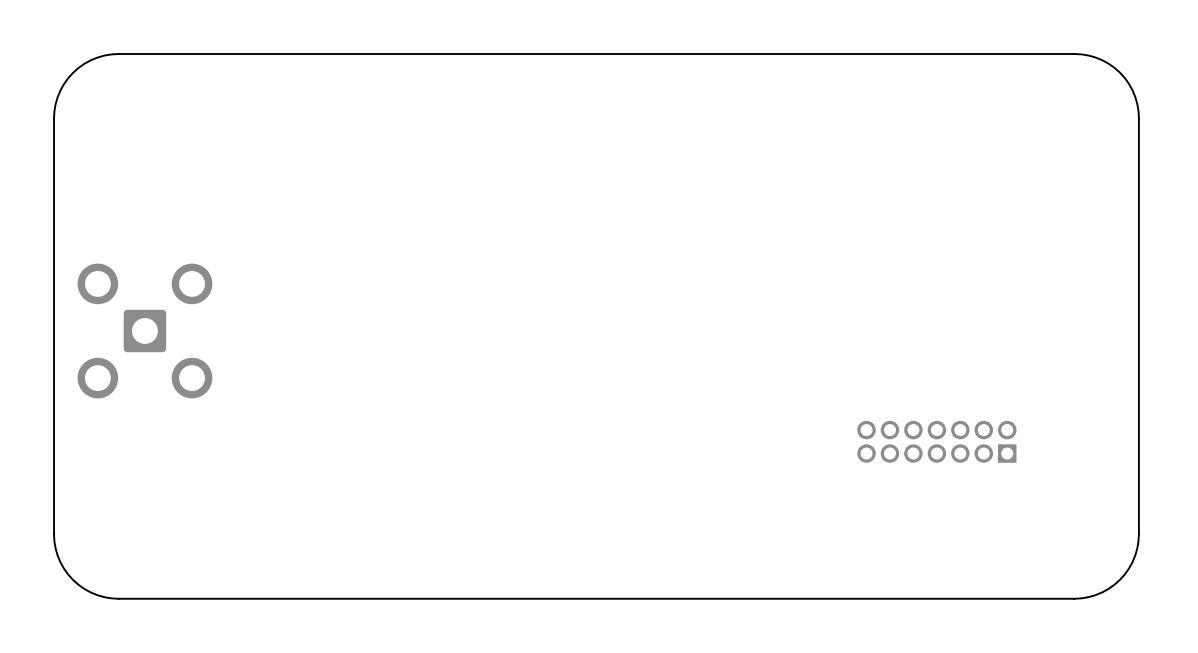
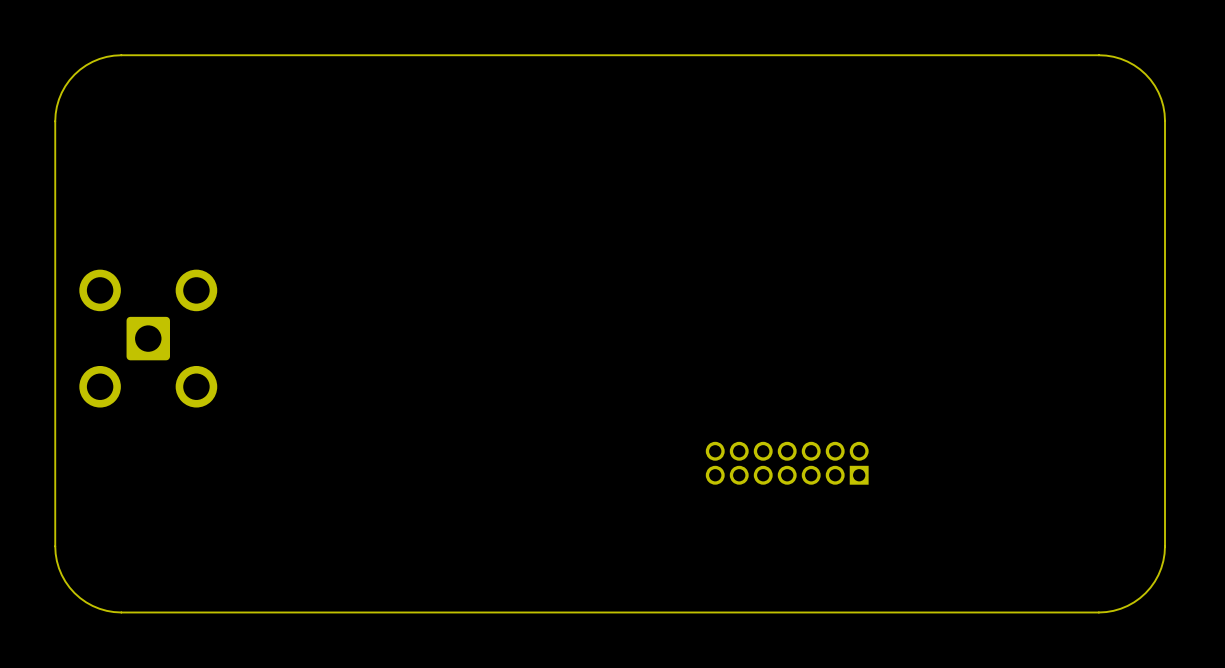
part position: (936, 441) -> (787, 463)

